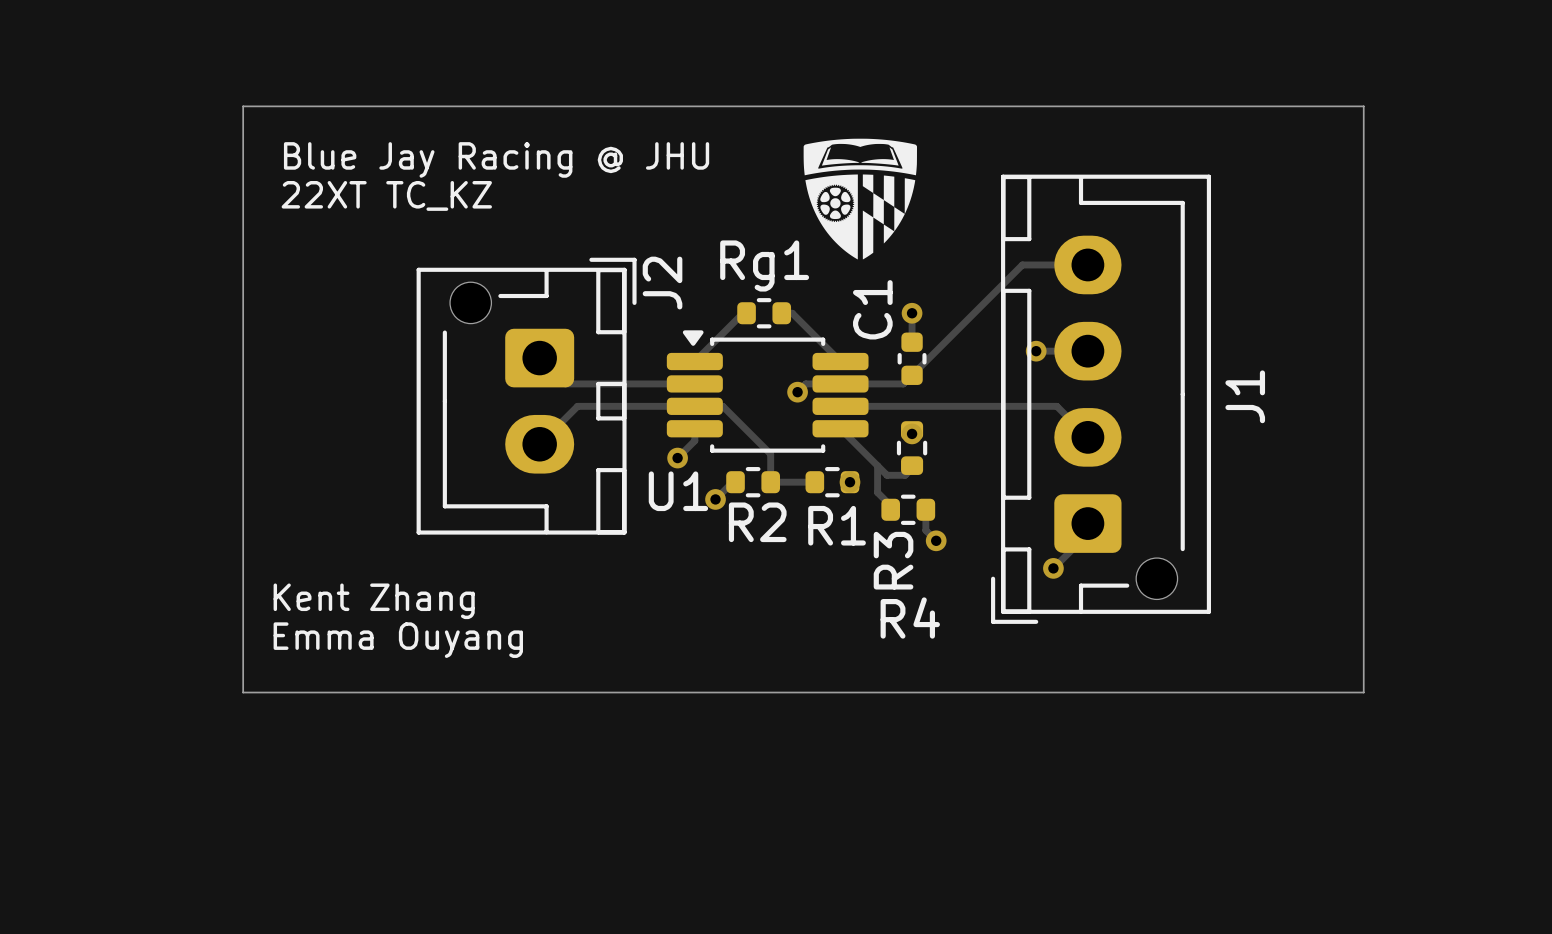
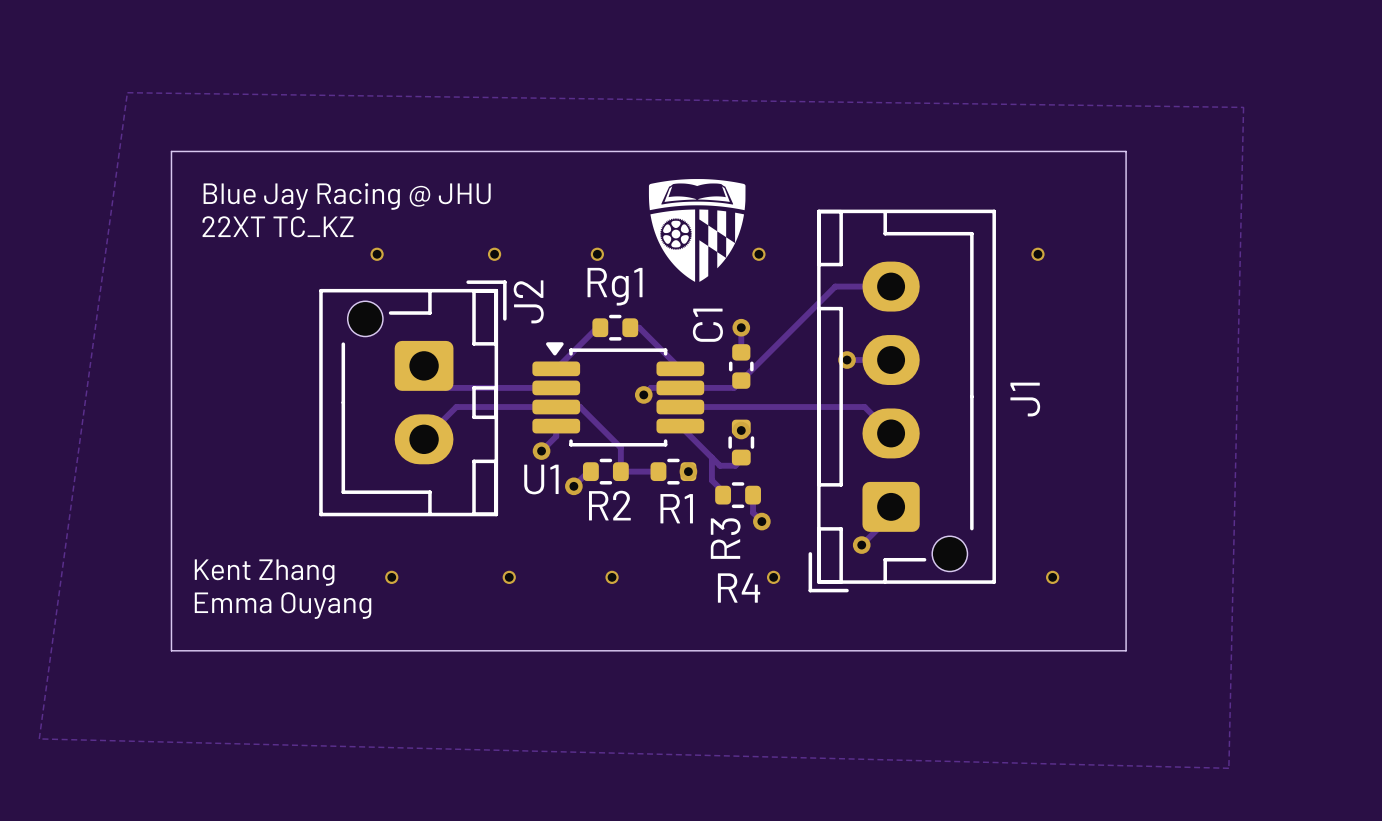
zone outline: none -> (127, 92) (1243, 107) (1228, 768) (39, 738) (127, 92)
via: none -> (377, 254)
via: none -> (494, 254)
via: none -> (597, 254)
via: none -> (758, 254)
via: none -> (1037, 254)
via: none -> (391, 577)
via: none -> (509, 577)
via: none -> (612, 577)
via: none -> (773, 577)
via: none -> (1052, 577)

